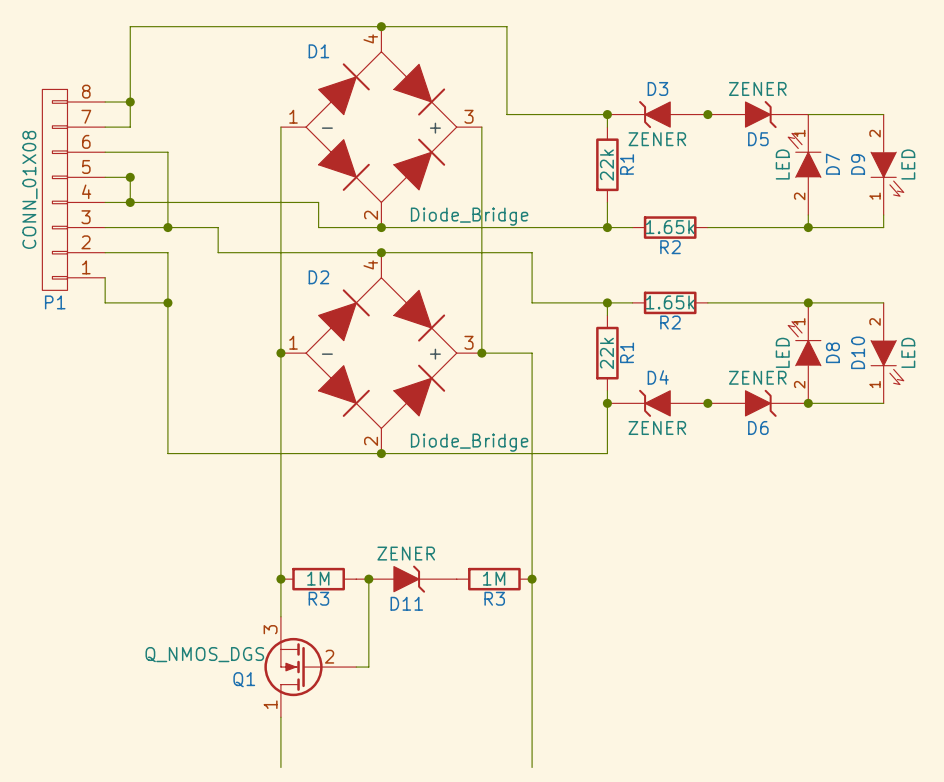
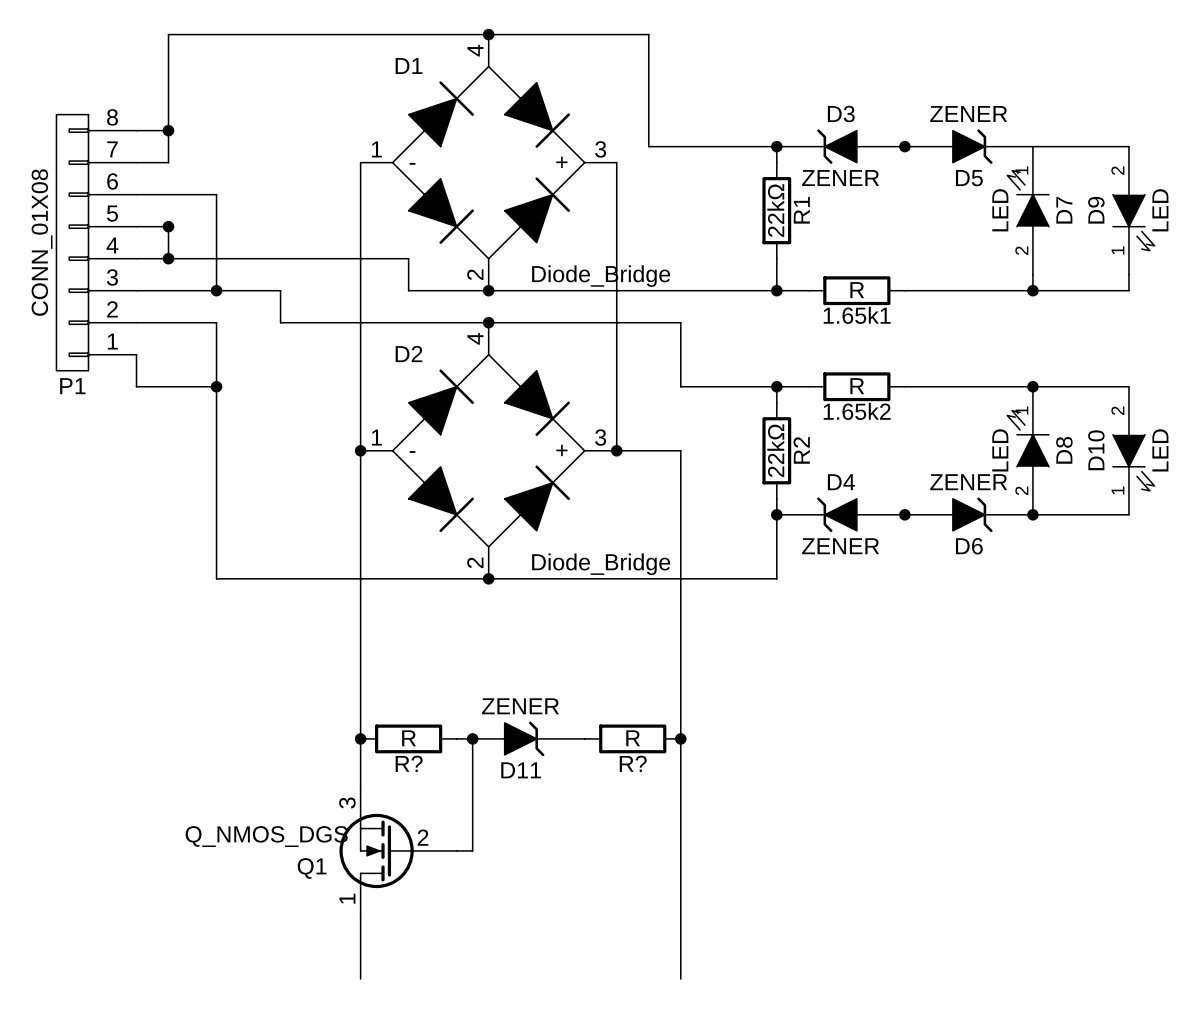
R1 value: 22k (606, 165) -> 22kΩ (775, 210)
R2 value: 1.65k (670, 227) -> R (857, 290)
R2 name: R2 (670, 247) -> 1.65k1 (857, 315)
R2 value: 1.65k (670, 302) -> R (857, 386)
R2 name: R2 (670, 322) -> 1.65k2 (857, 411)
R1 name: R1 (627, 352) -> R2 (801, 450)
R1 value: 22k (606, 353) -> 22kΩ (775, 450)
R3 value: 1M (318, 578) -> R (409, 738)
R3 value: 1M (494, 578) -> R (633, 738)
R3 name: R3 (318, 598) -> R? (409, 763)
R3 name: R3 (494, 598) -> R? (633, 763)

